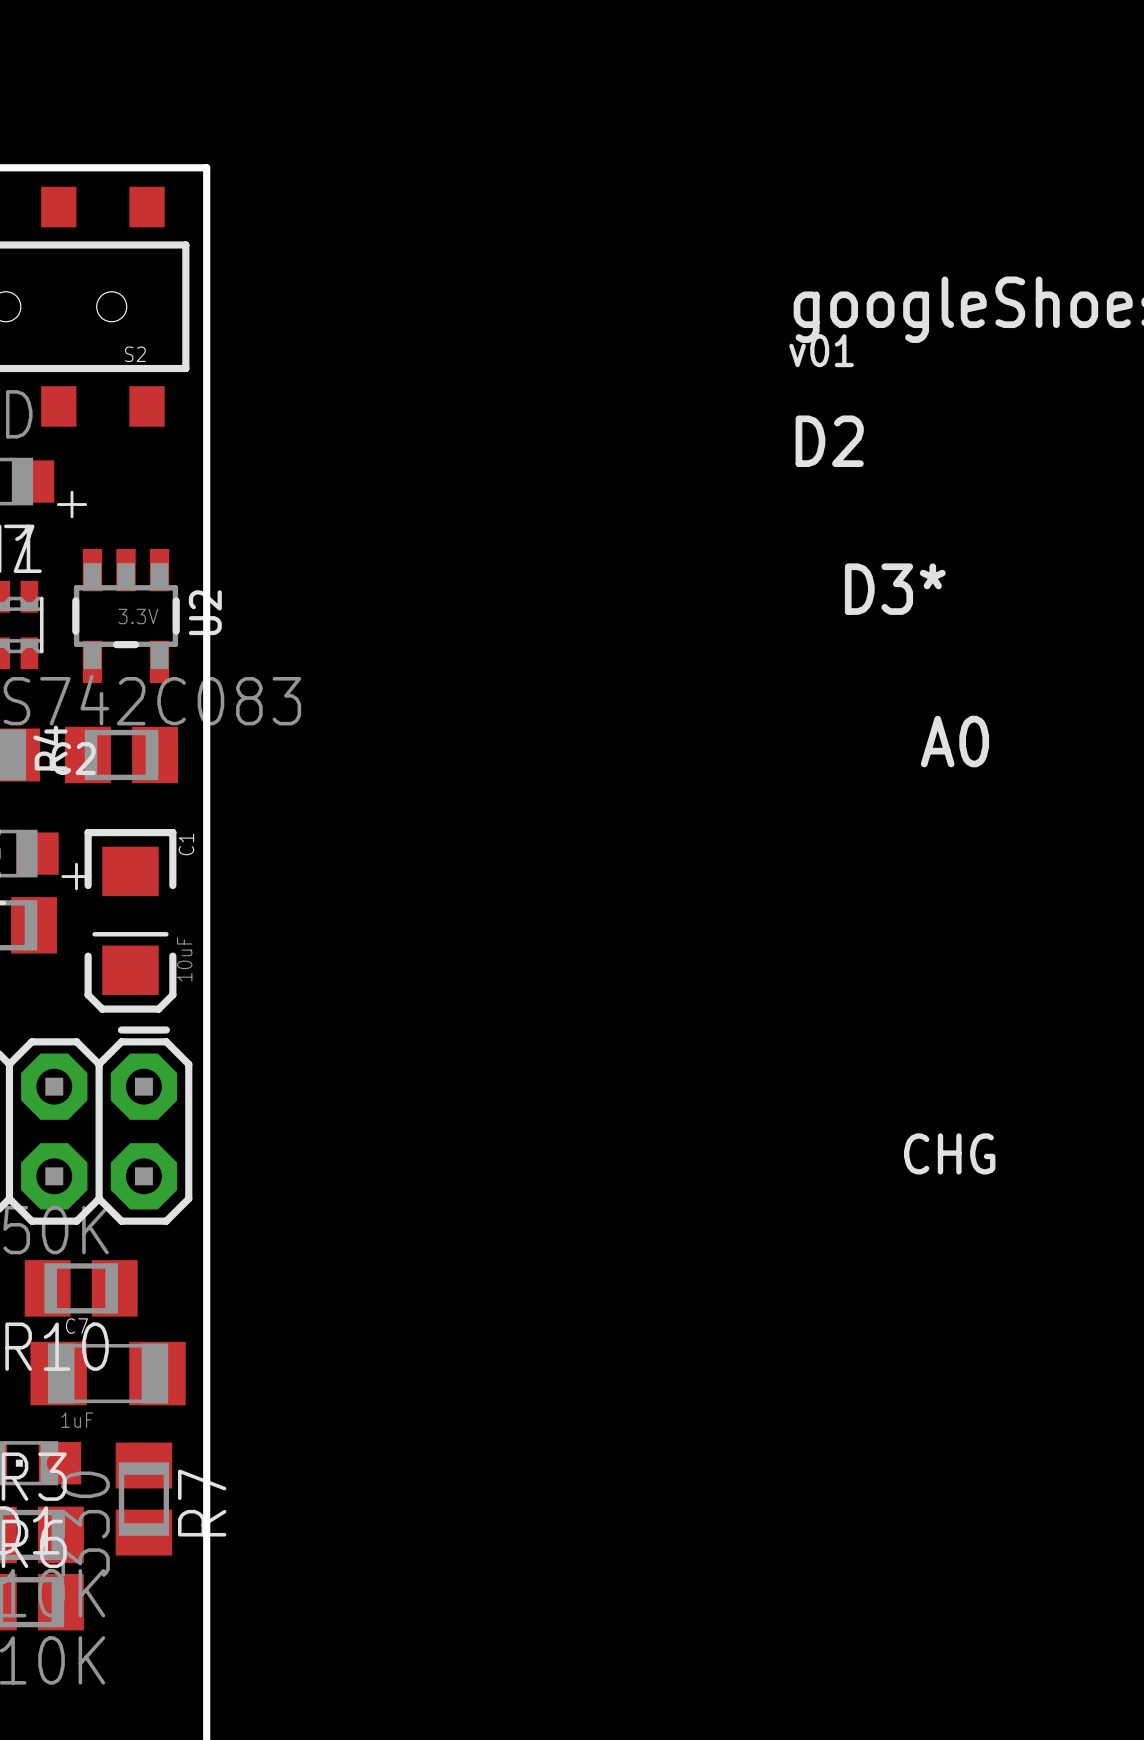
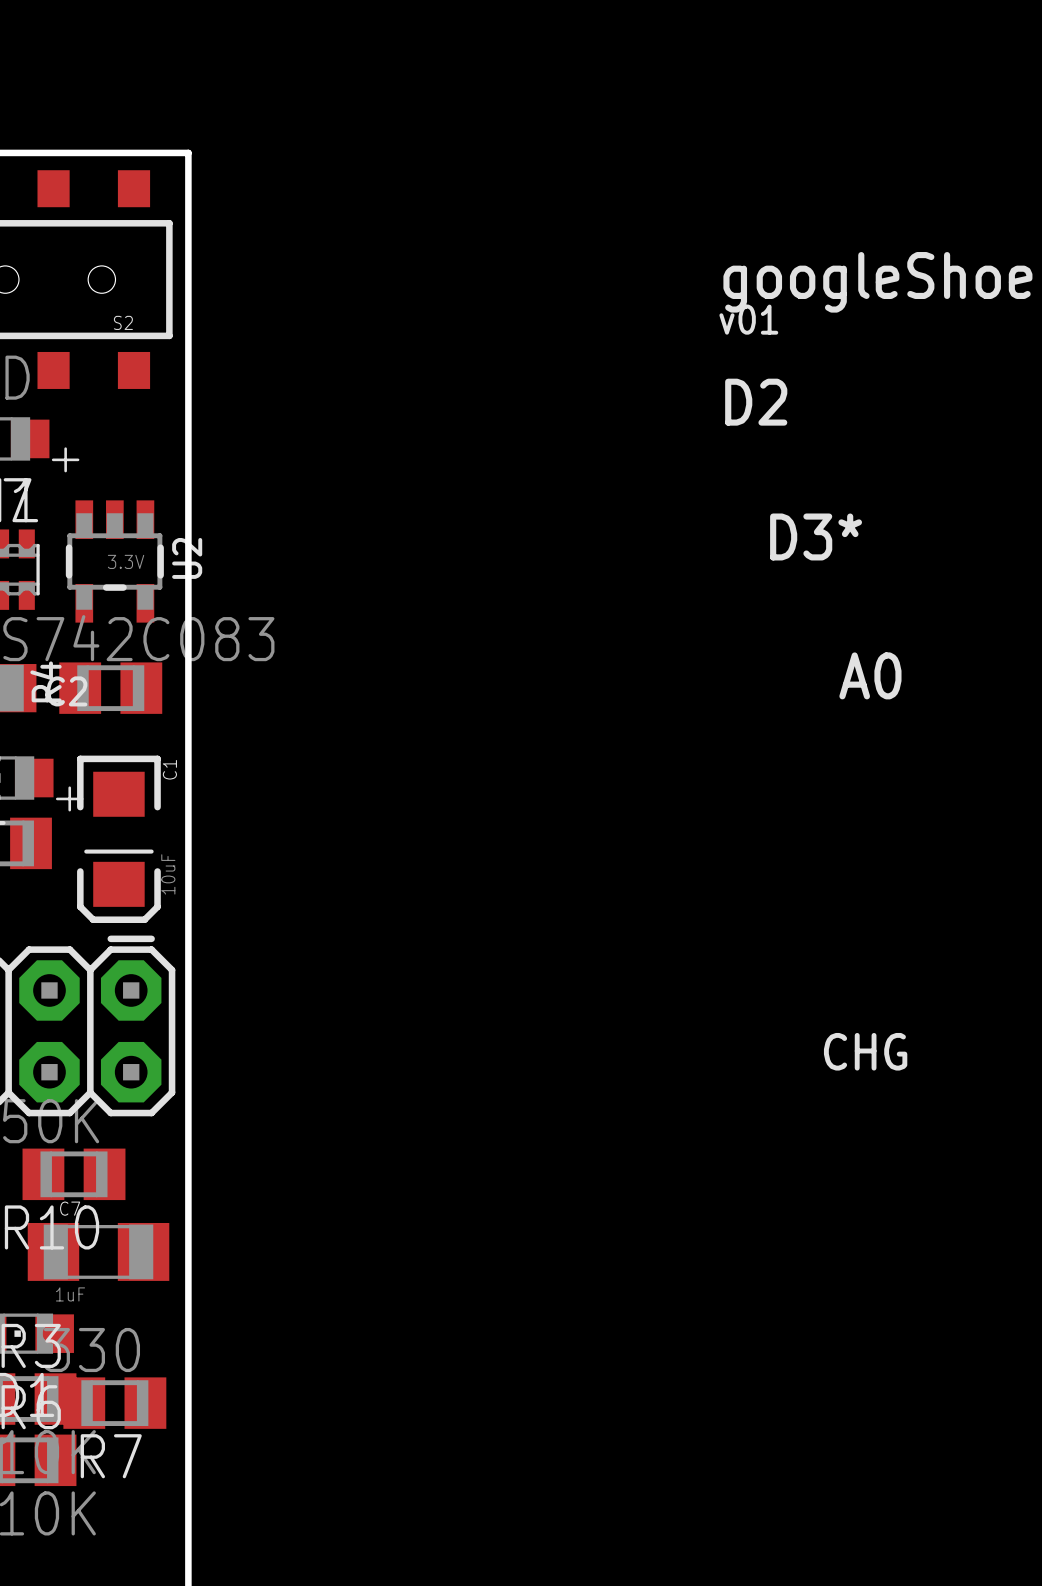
R7 rotation: 0° (143, 1499) -> 90° clockwise (114, 1403)

